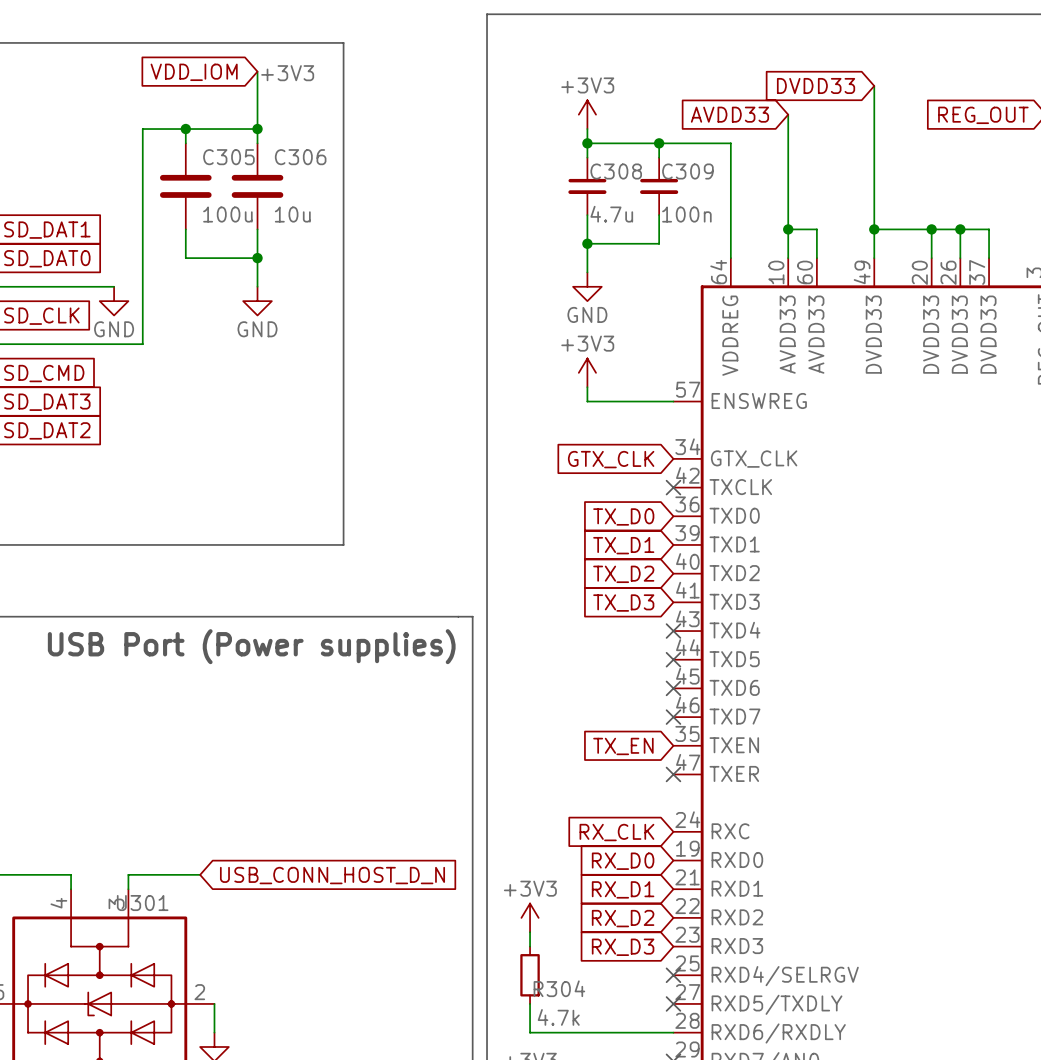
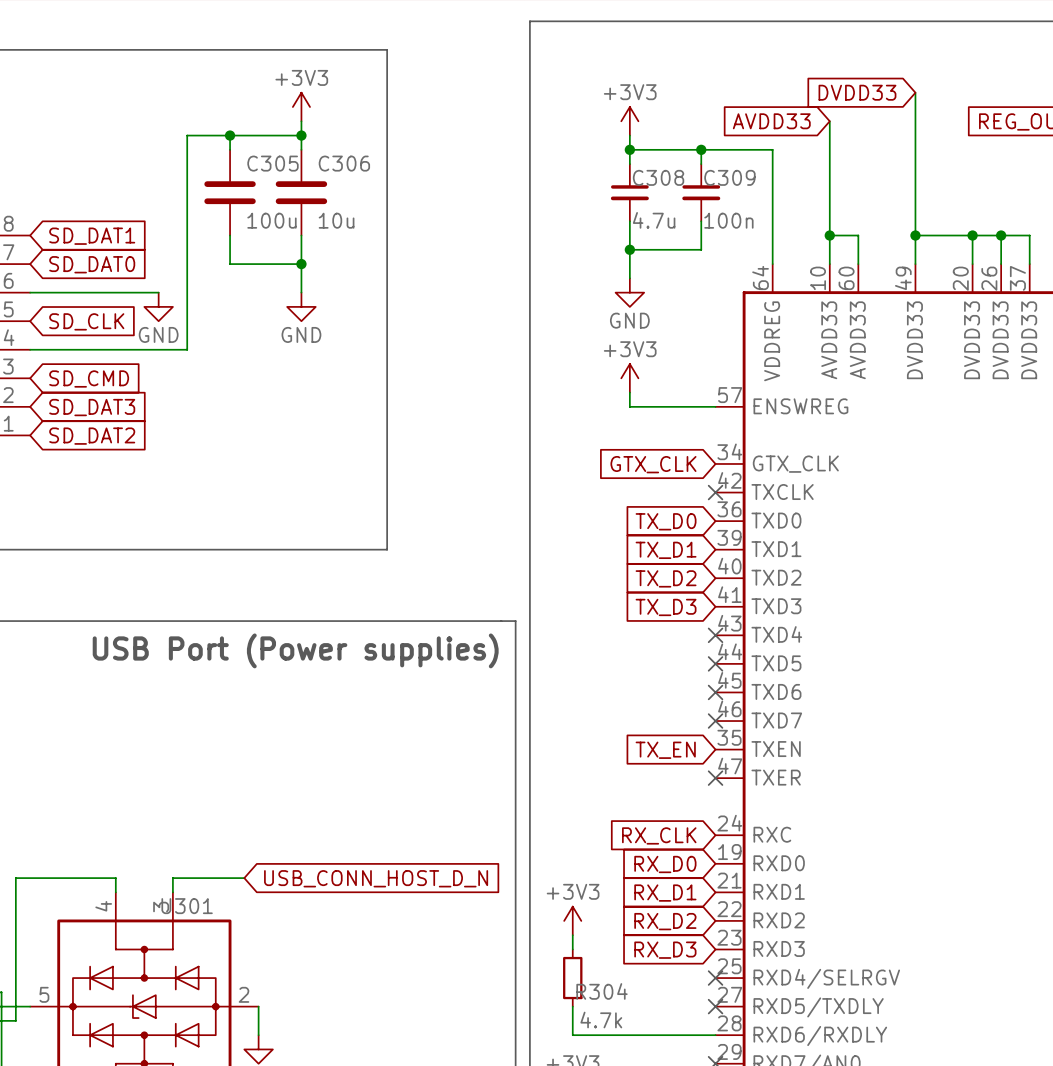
global label: VDD_IOM (194, 72) -> none
label: +3V3 (287, 73) -> none
power symbol: none -> +3V3 (301, 107)

